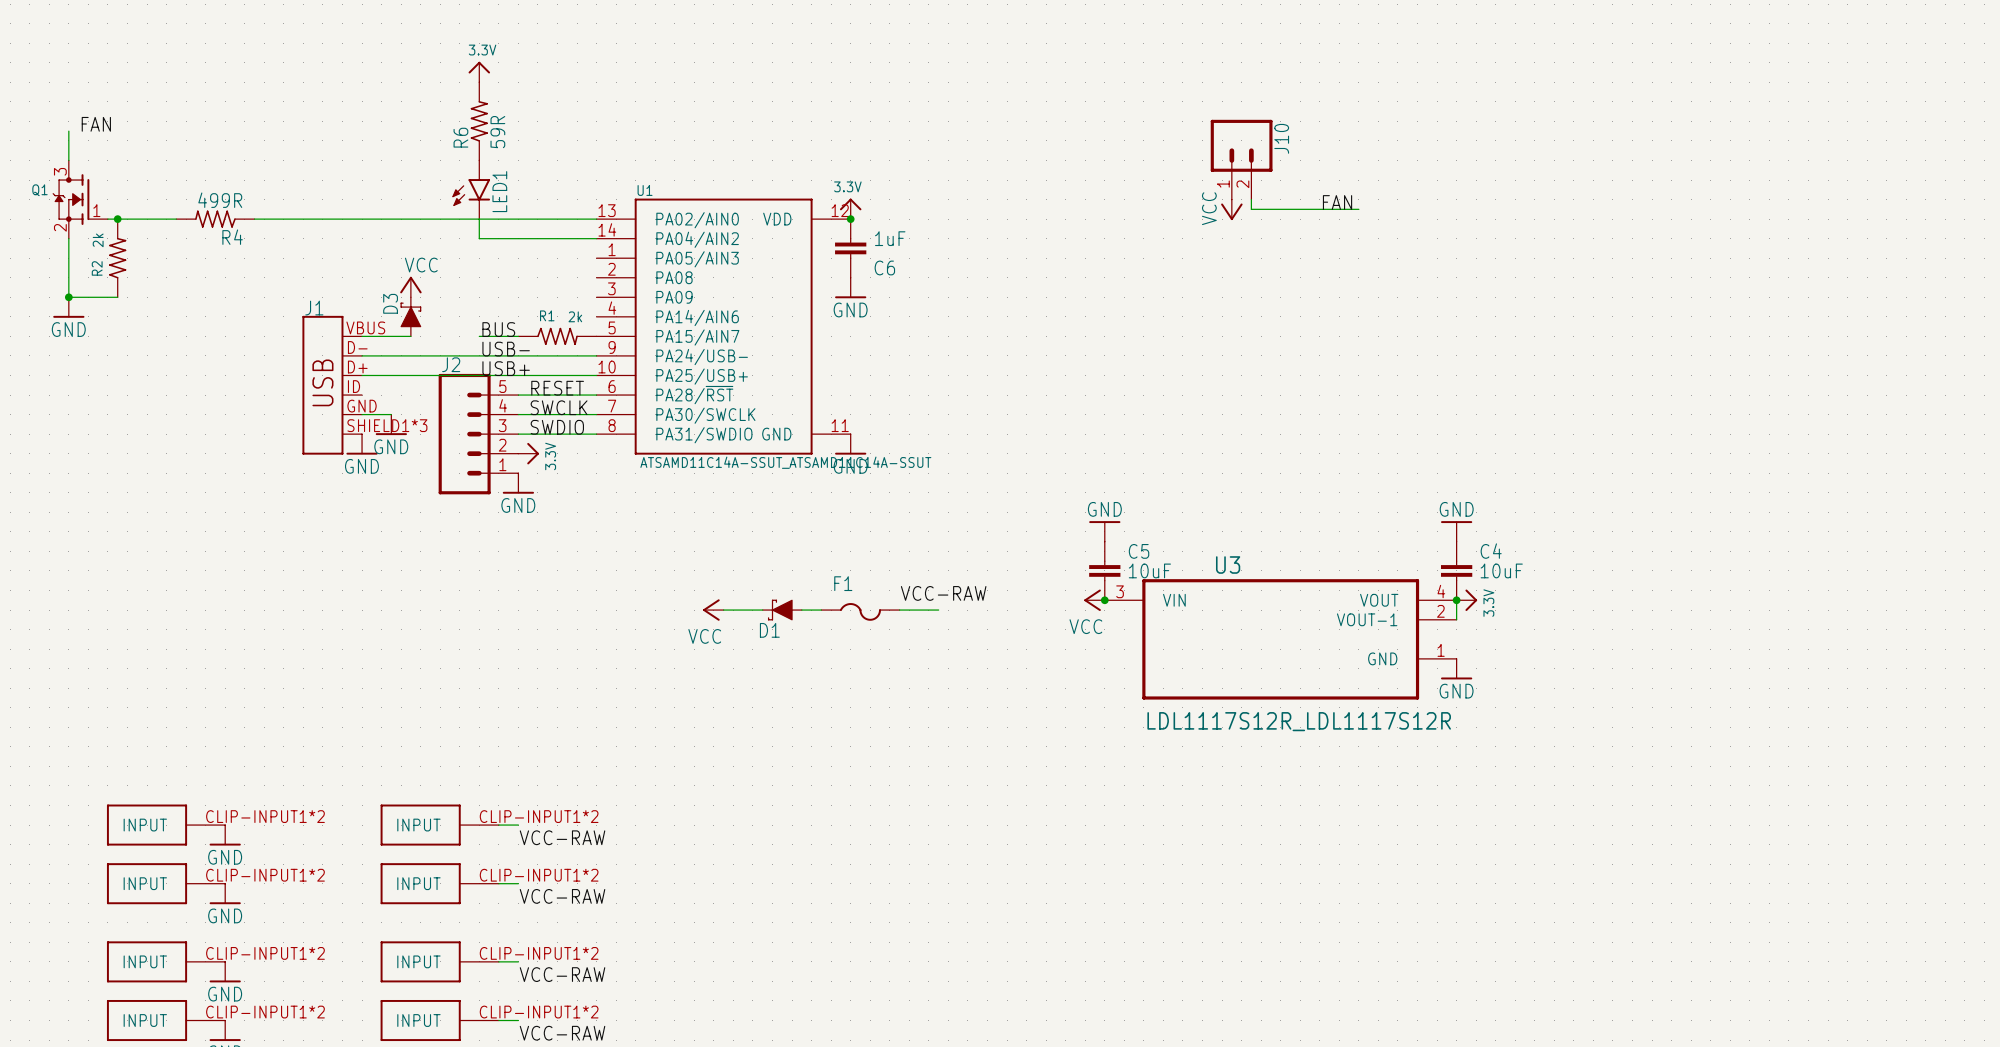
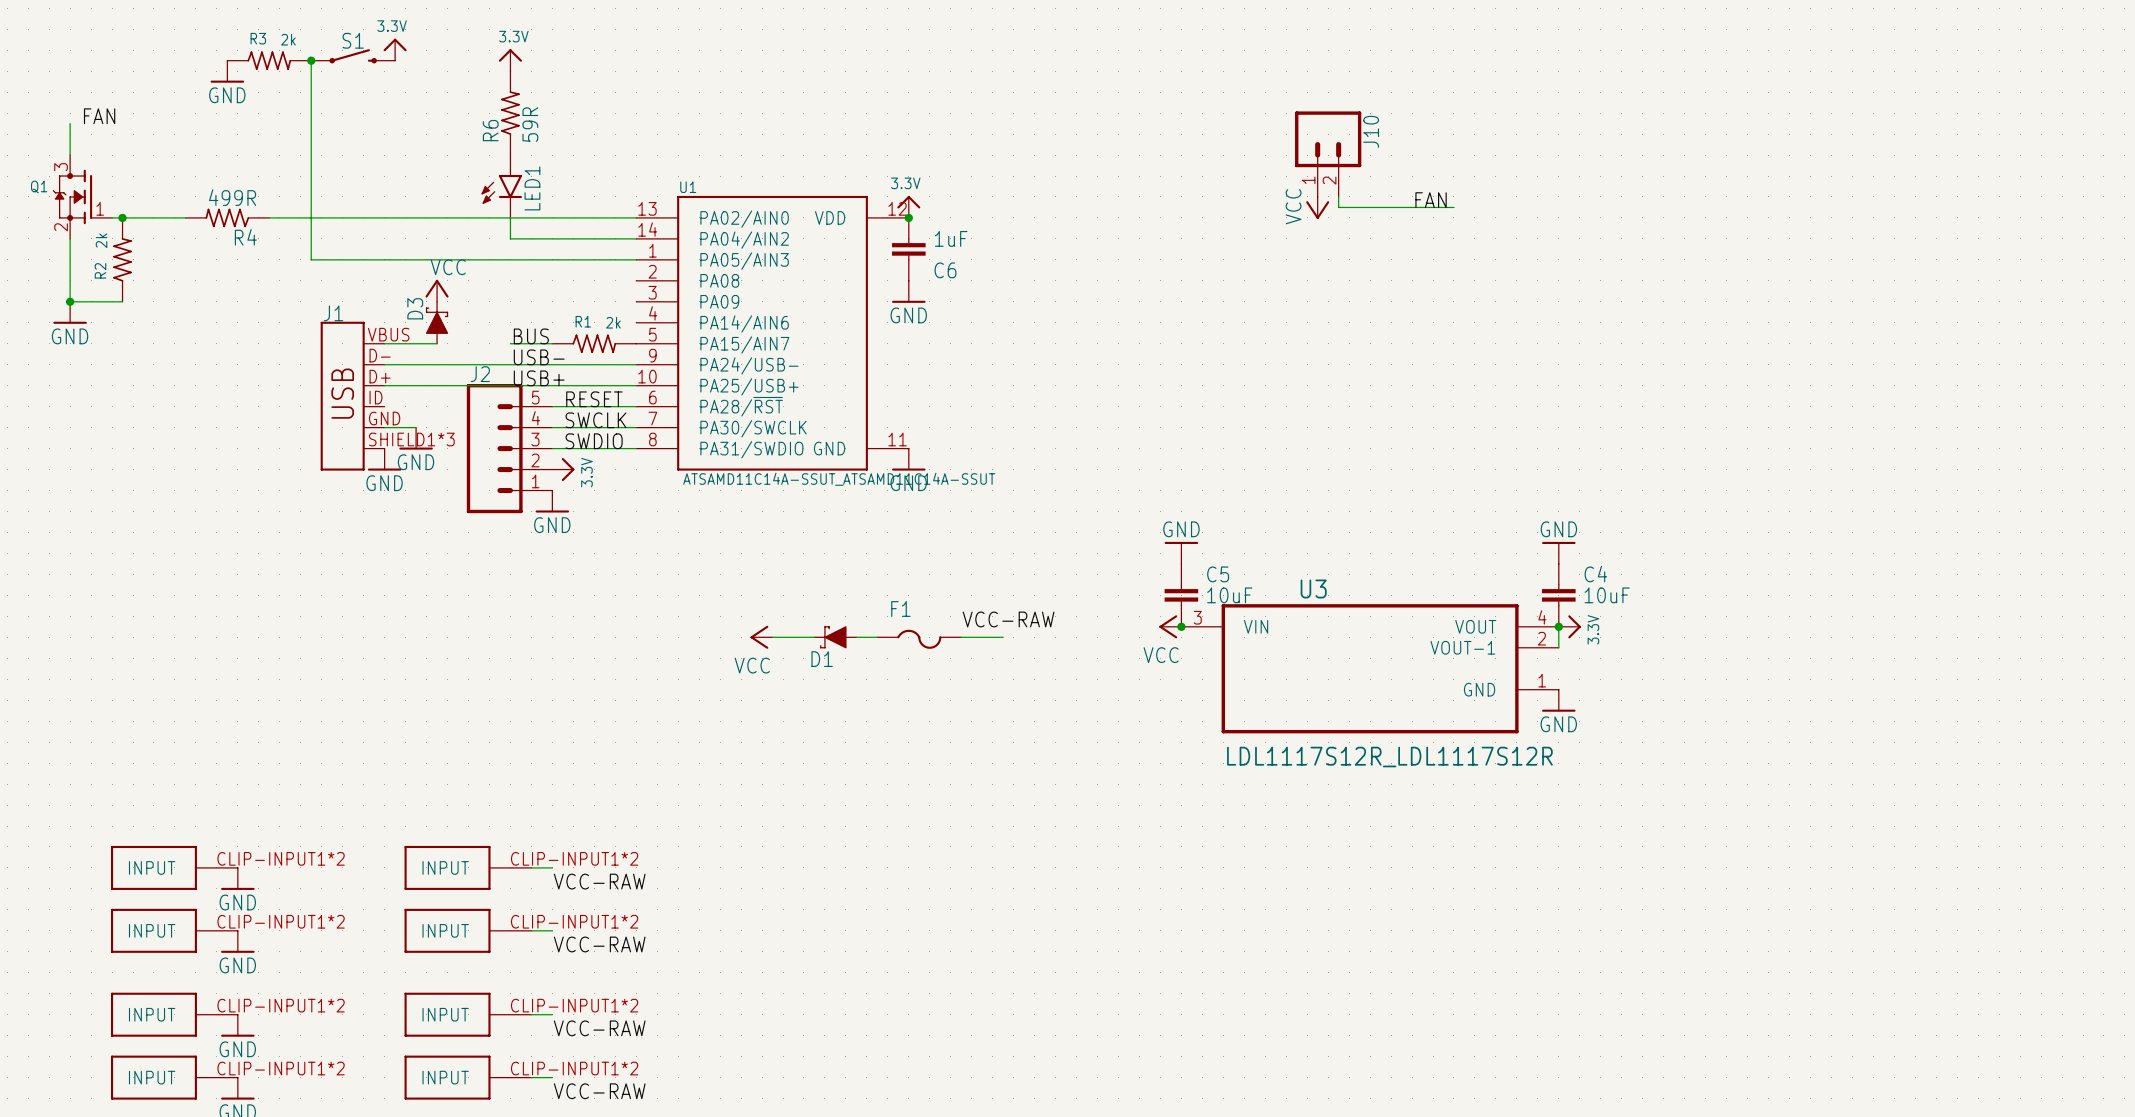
power symbol: none -> 3.3V (395, 49)
S1: none -> (353, 56)
R3: none -> 2k (269, 60)
wire: none -> (311, 60) (311, 259) (636, 259)
junction: none -> (311, 60)
power symbol: none -> GND (227, 71)

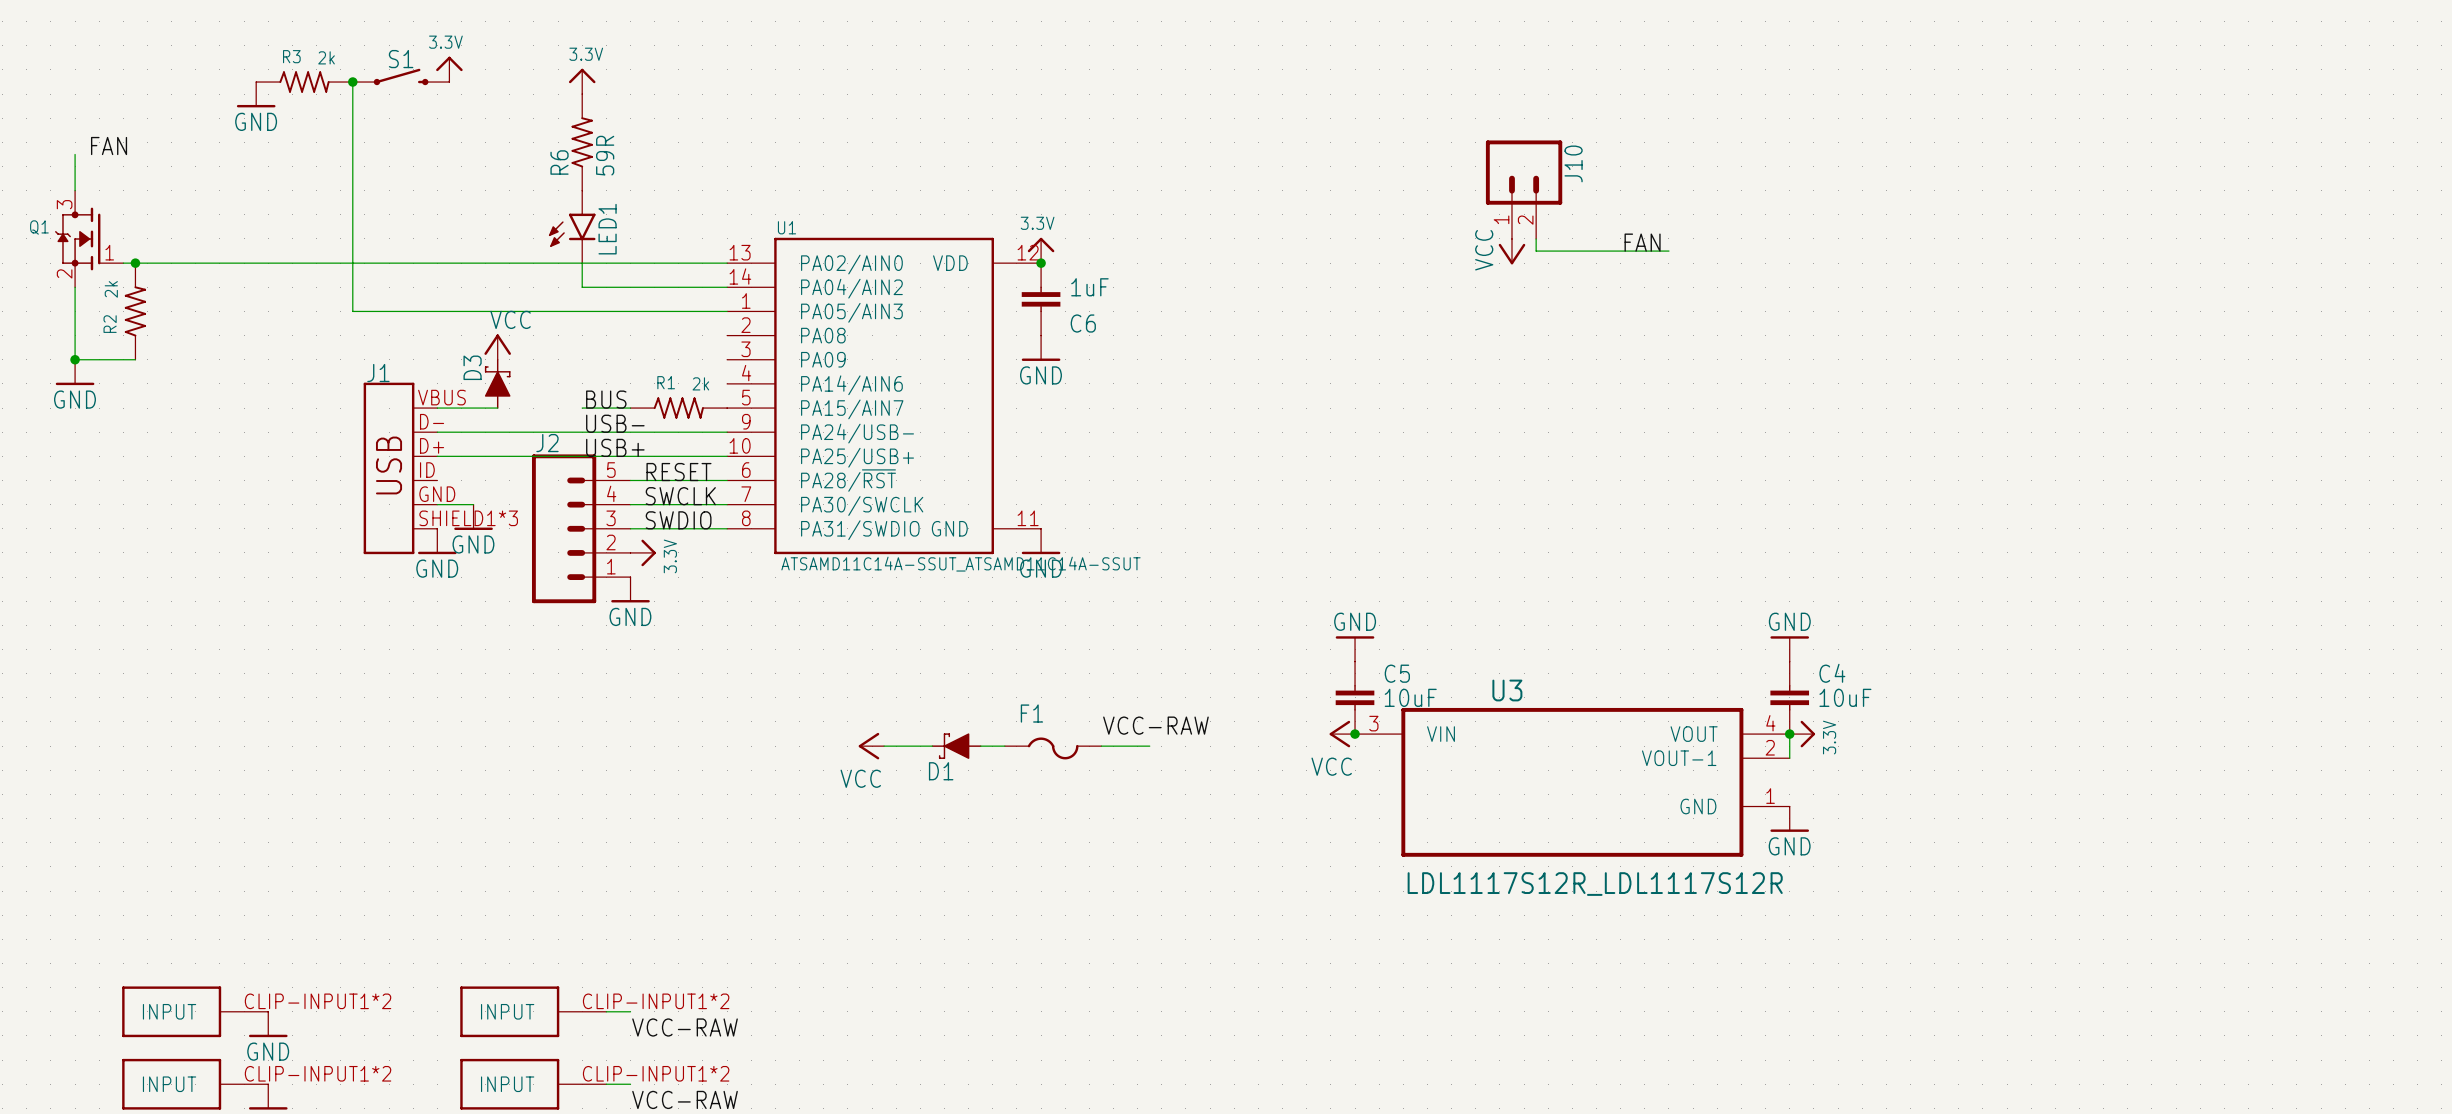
R4: 499R (227, 217) -> none

